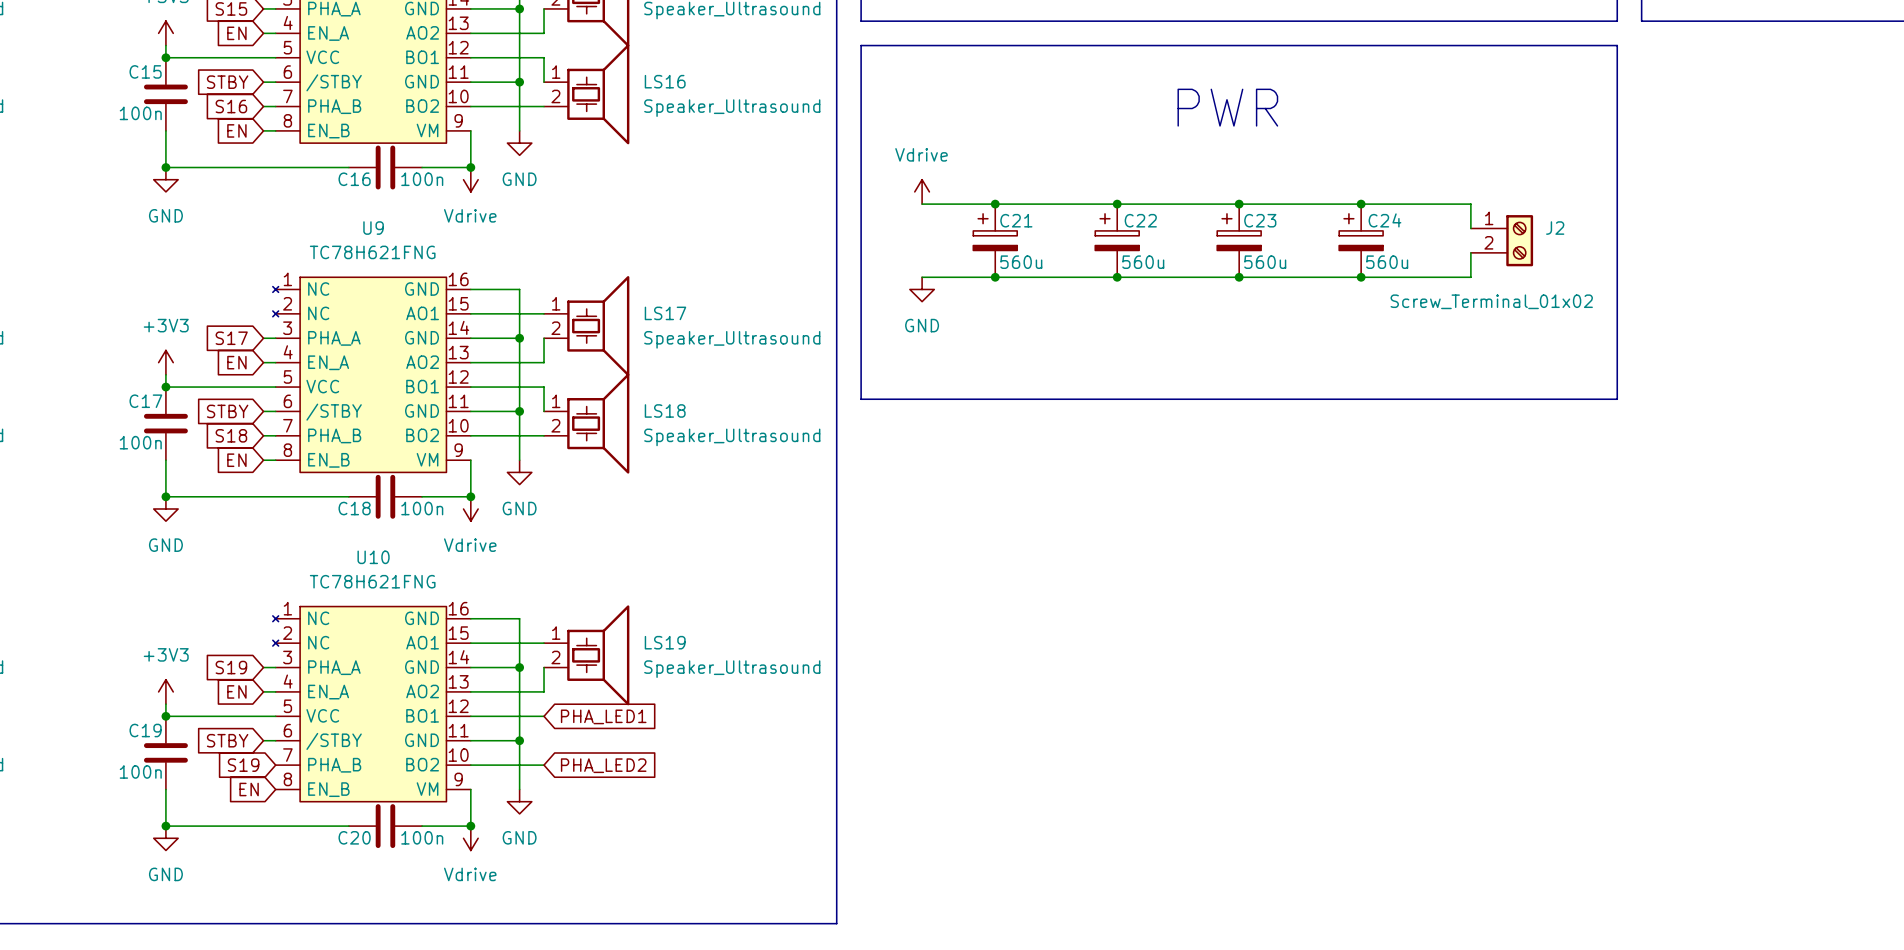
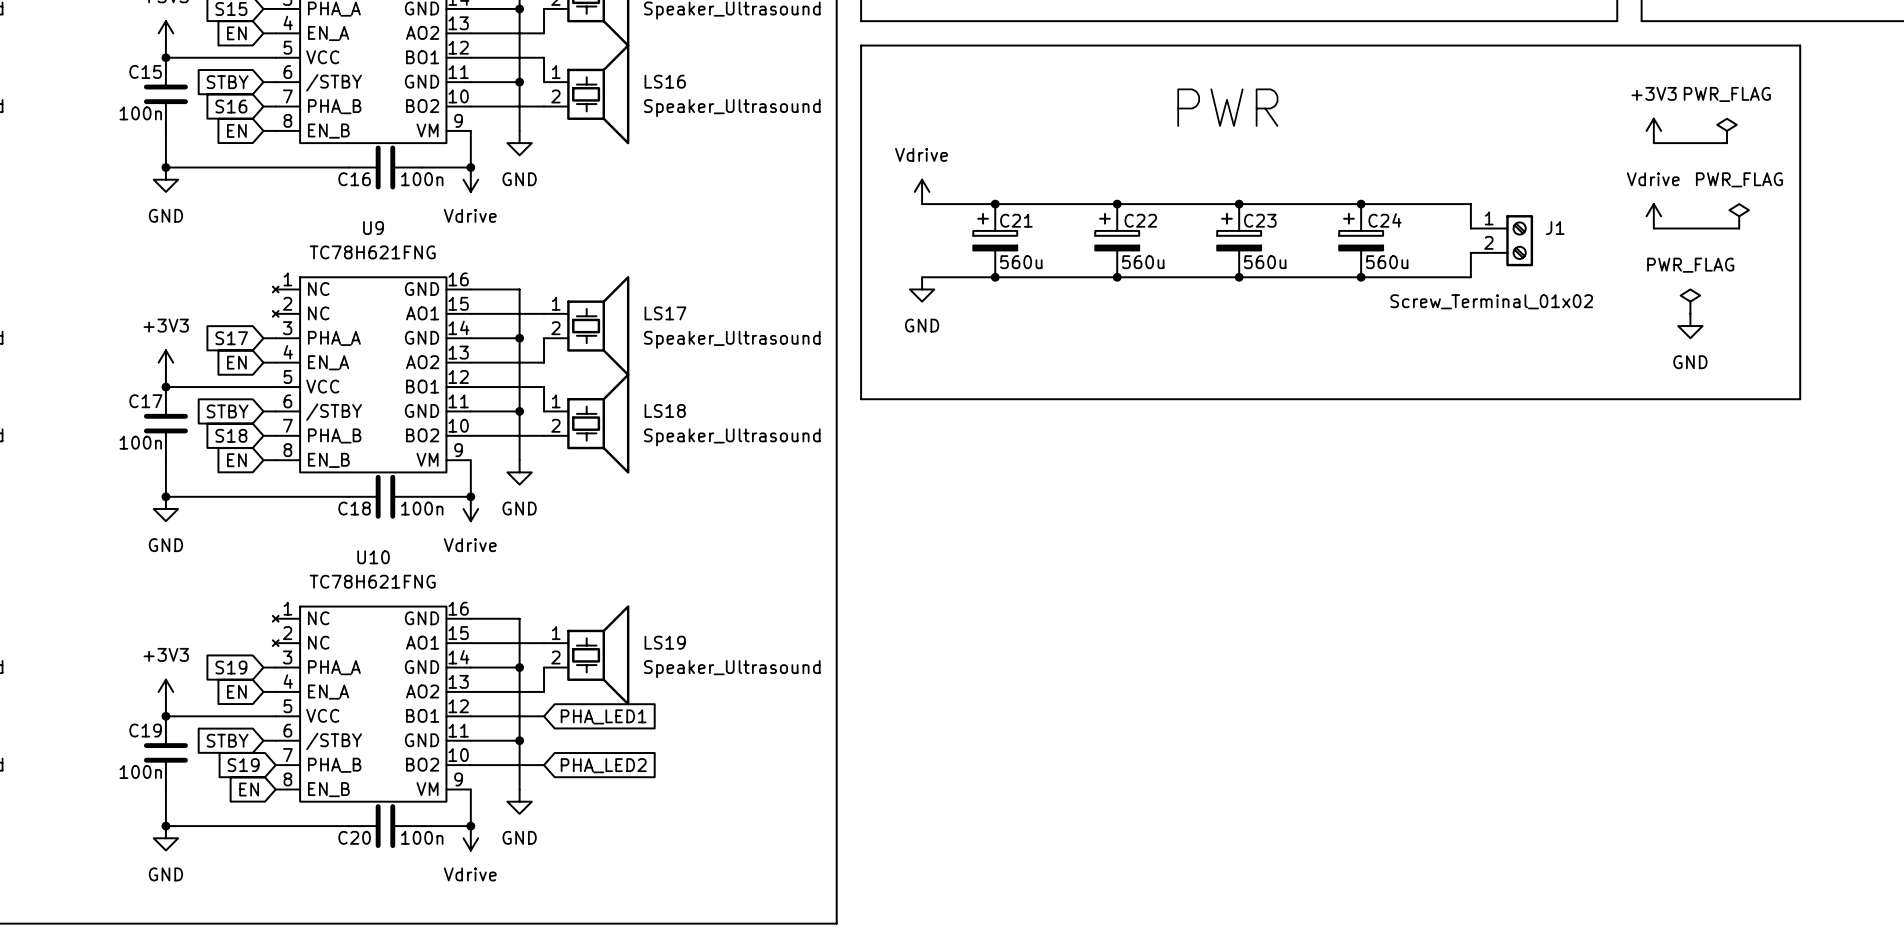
line: (1617, 45) (1617, 399) -> (1617, 45) (1800, 45) (1800, 399) (1617, 399)
power symbol: none -> +3V3 (1653, 130)
power symbol: none -> PWR_FLAG (1727, 130)
wire: none -> (1653, 143) (1727, 143)
power symbol: none -> Vdrive (1653, 216)
power symbol: none -> PWR_FLAG (1739, 216)
J2 name: J2 (1555, 228) -> J1 (1555, 228)
wire: none -> (1653, 228) (1739, 228)
power symbol: none -> PWR_FLAG (1690, 301)
power symbol: none -> GND (1690, 326)

